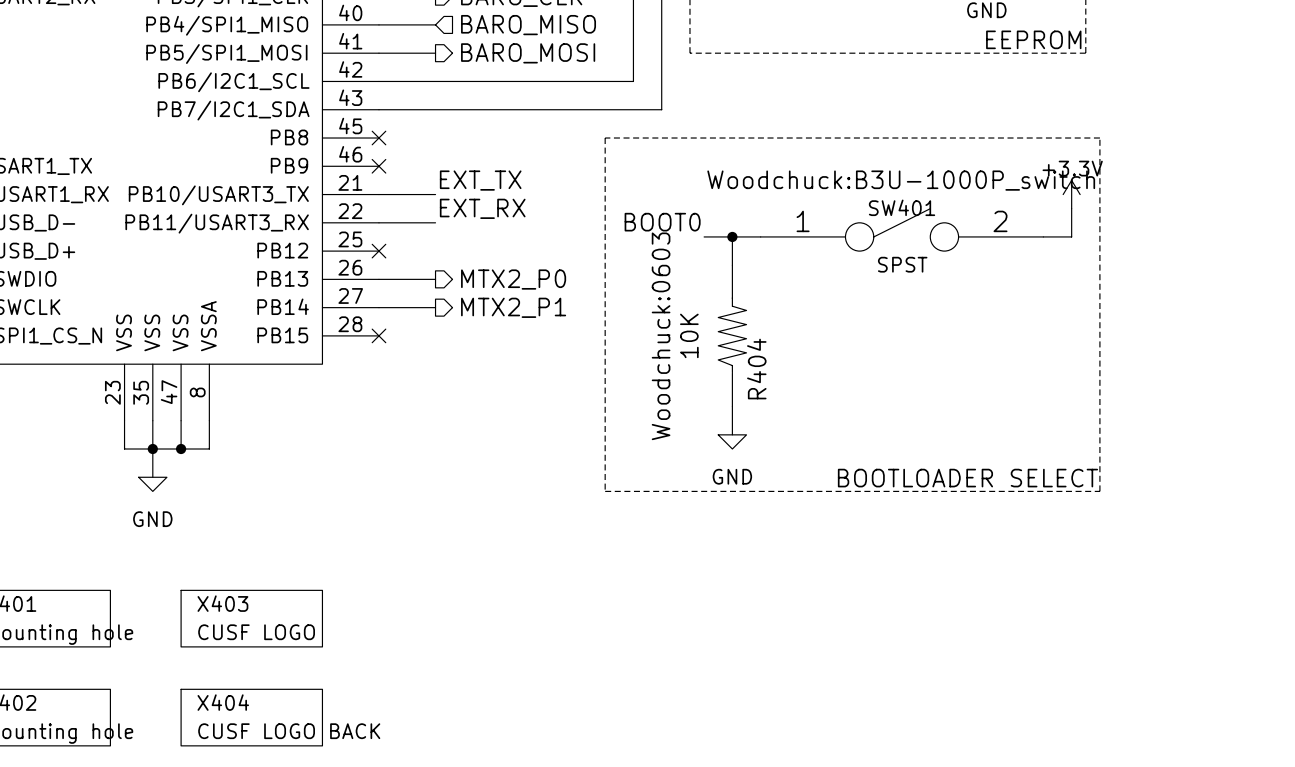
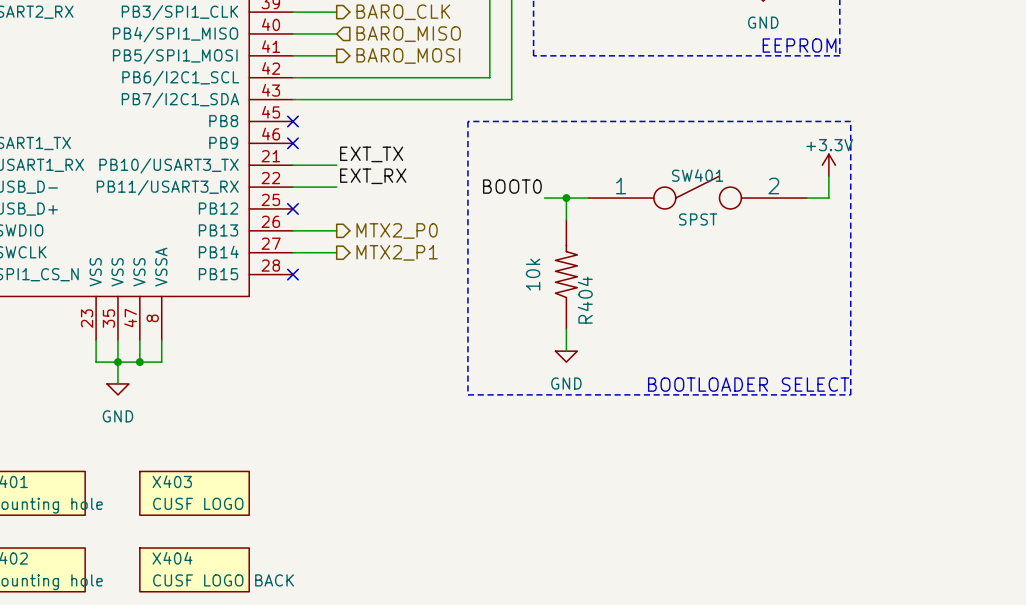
SW401 text: Woodchuck:B3U-1000P_switch (901, 180) -> none
R404 value: 10K (689, 335) -> 10k (533, 274)
R404 text: Woodchuck:0603 (661, 336) -> none

